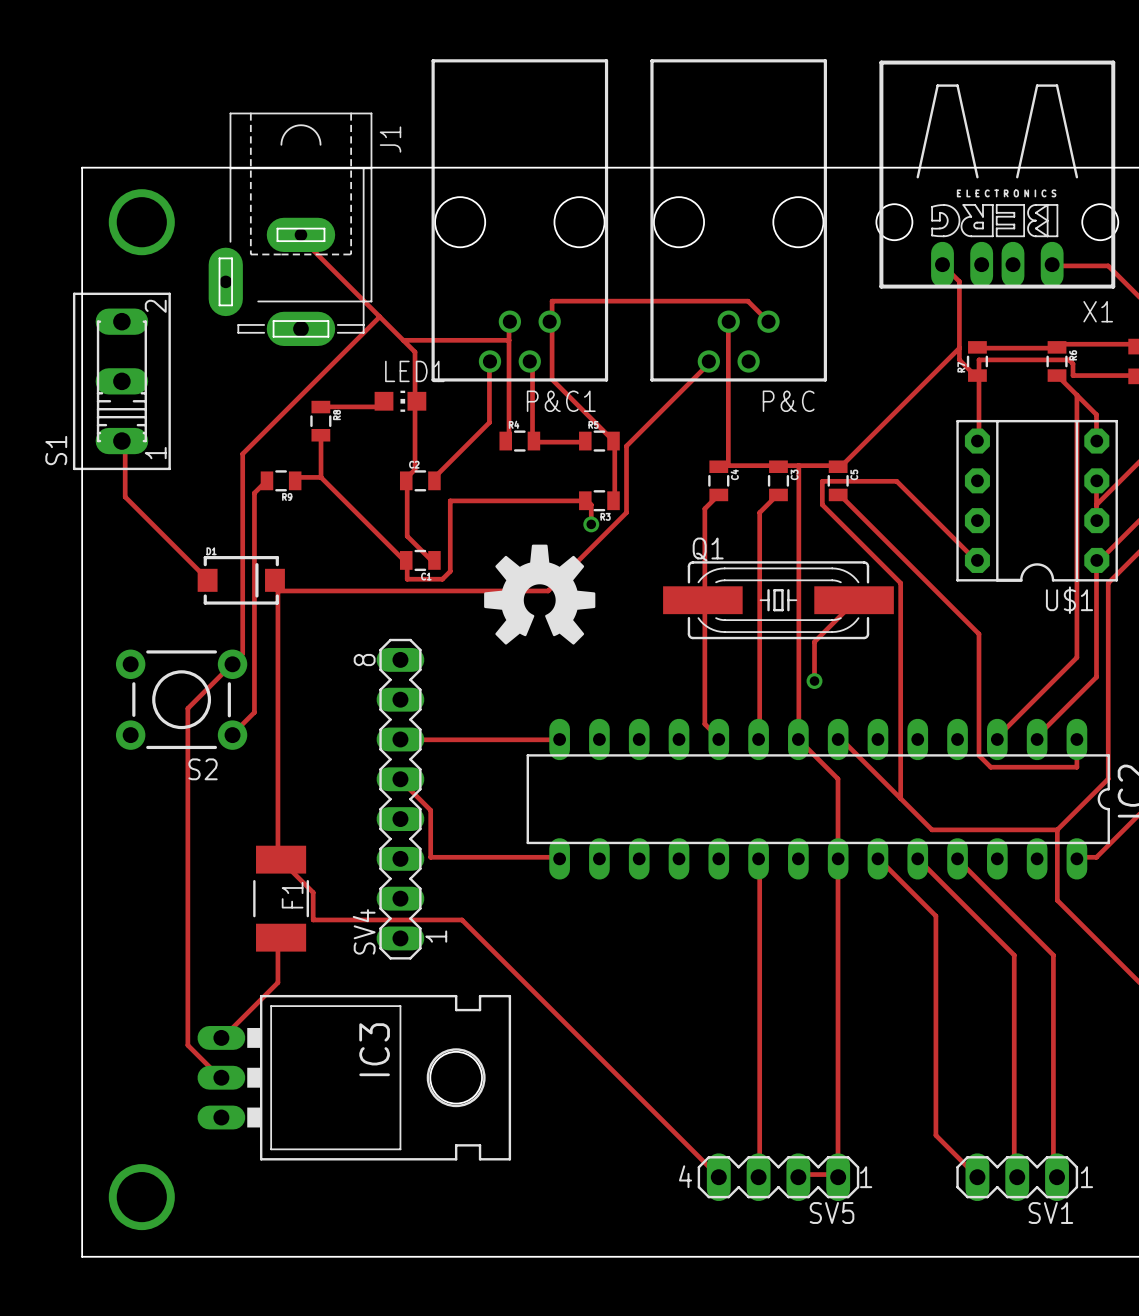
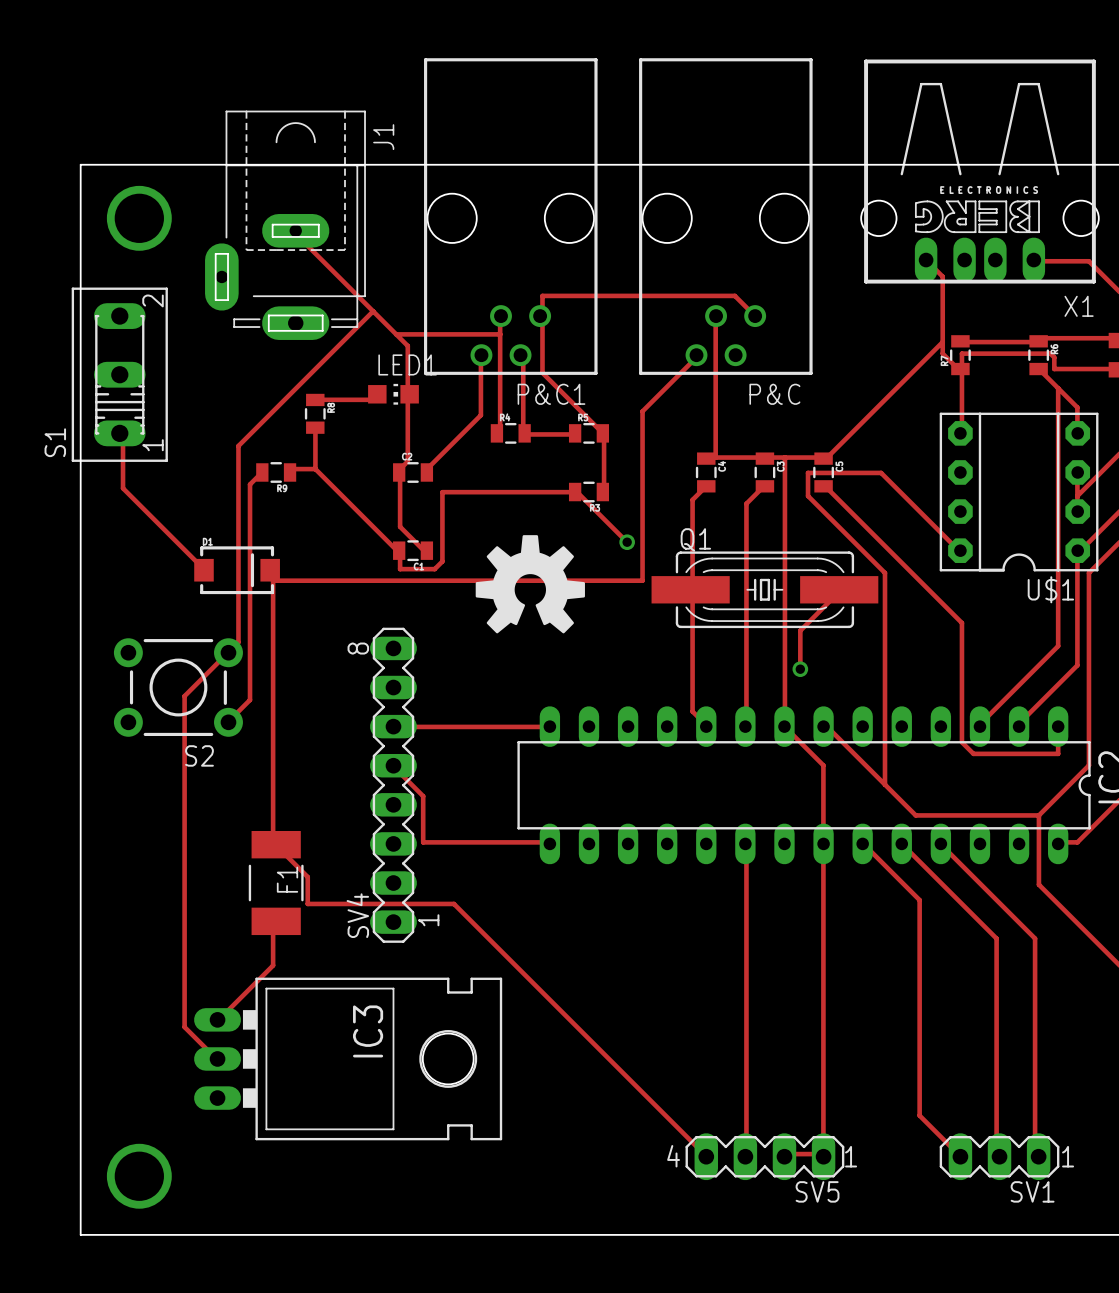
track: (653, 418) (626, 446) (626, 512) (548, 590) -> (642, 411) (642, 580) (538, 580)
track: (591, 504) (591, 524) -> (580, 496) (627, 542)
via position: (591, 524) -> (627, 542)

